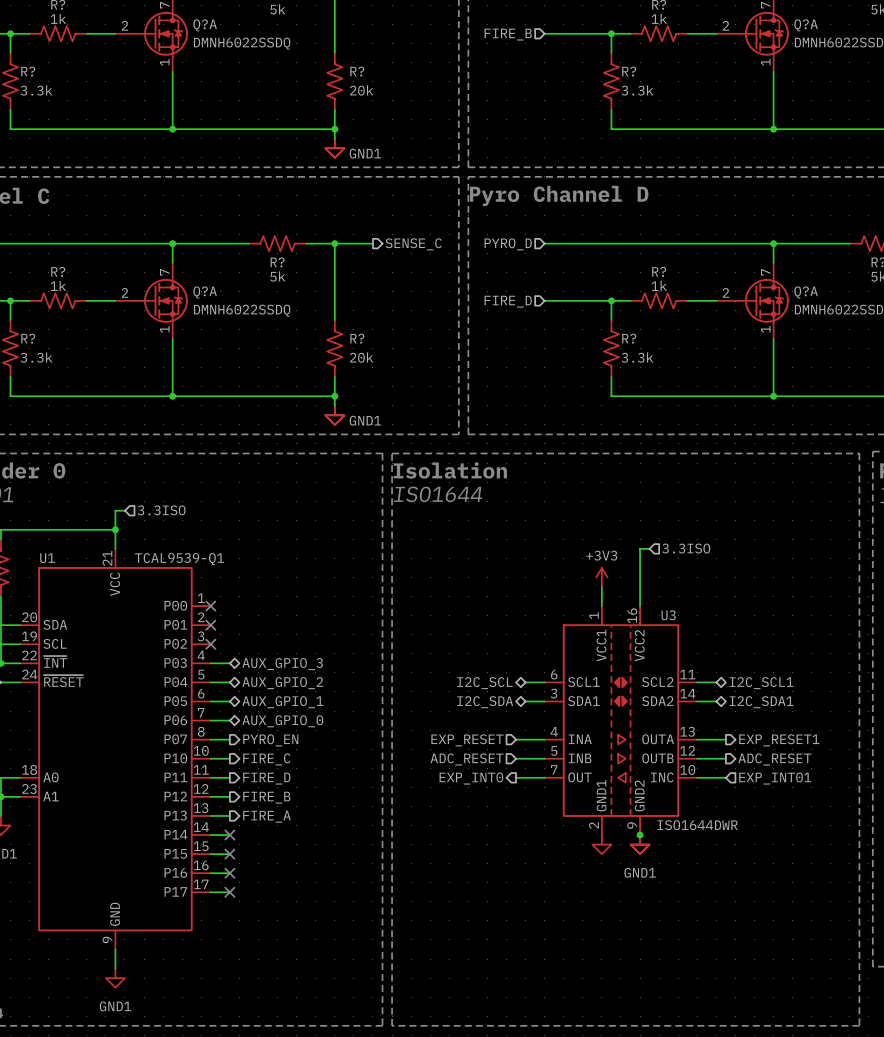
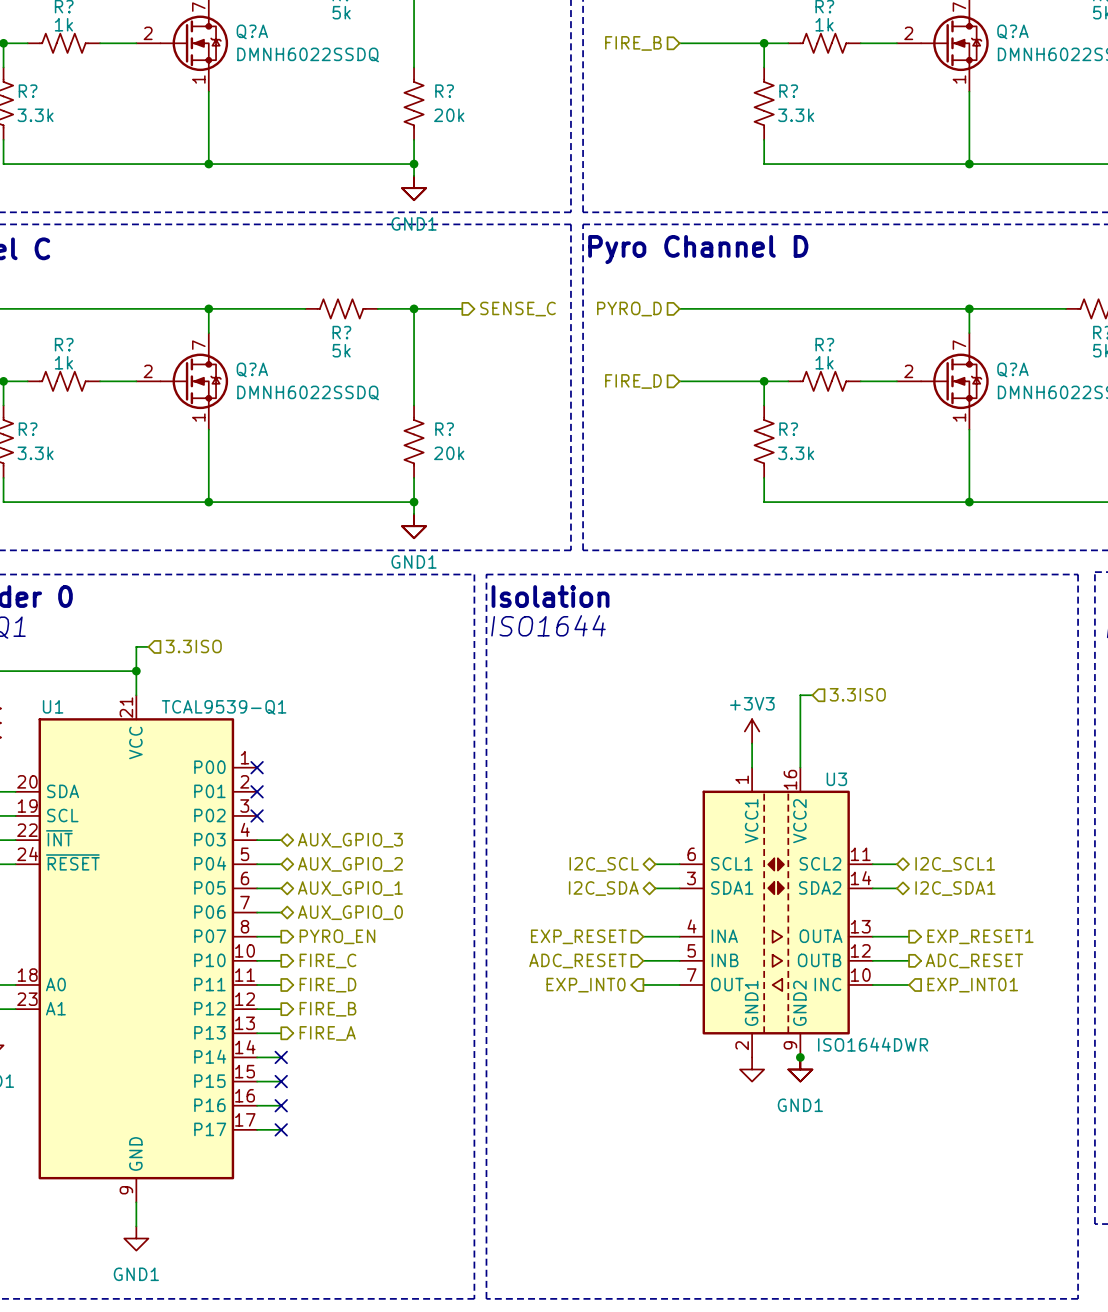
power symbol text position: GND1 (365, 153) -> GND1 (414, 223)
power symbol text position: GND1 (365, 420) -> GND1 (414, 561)

